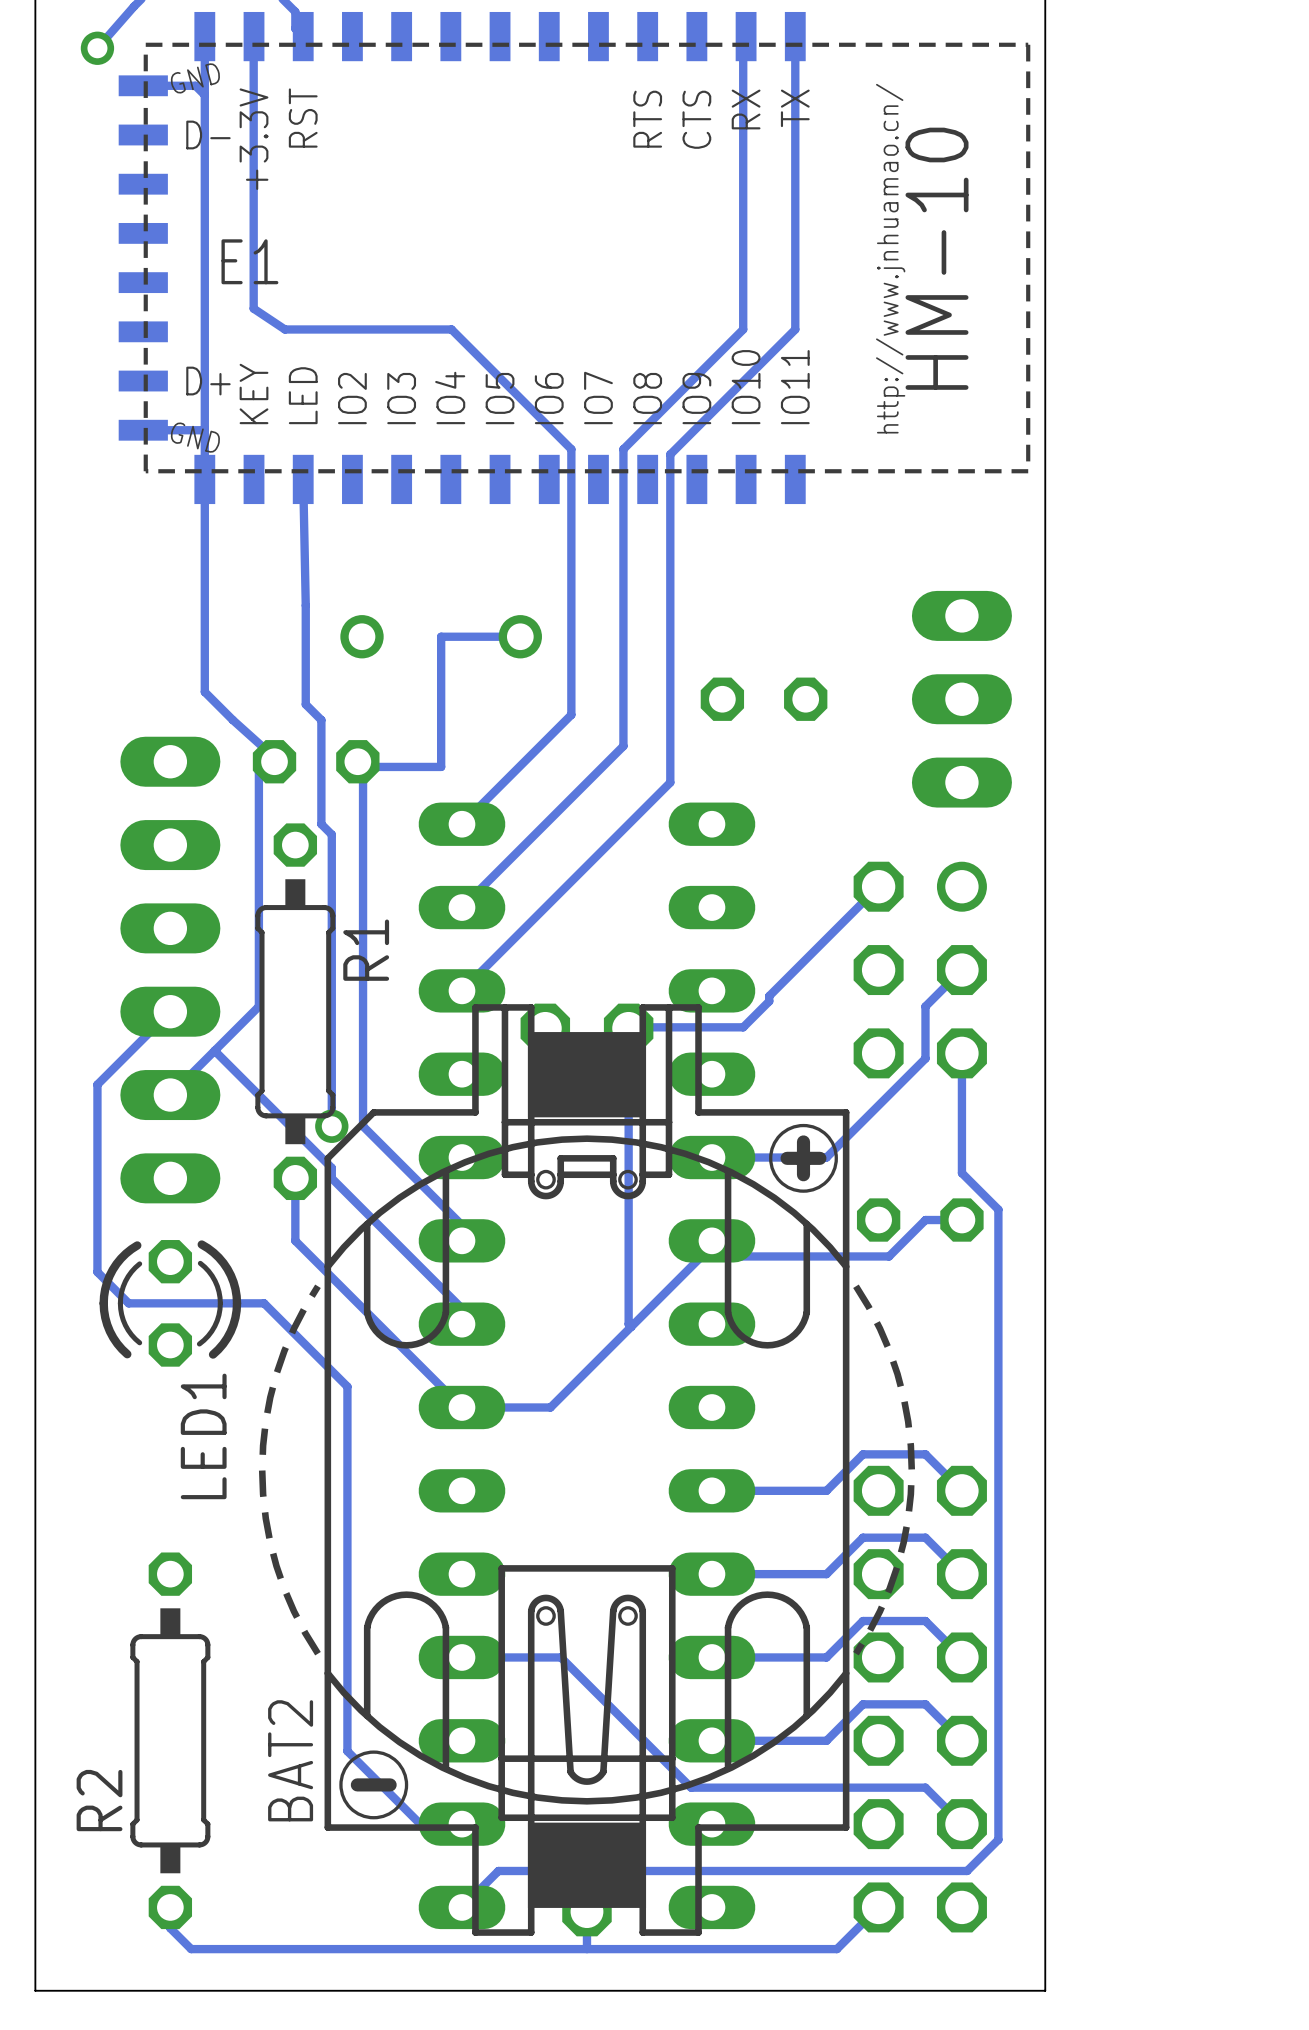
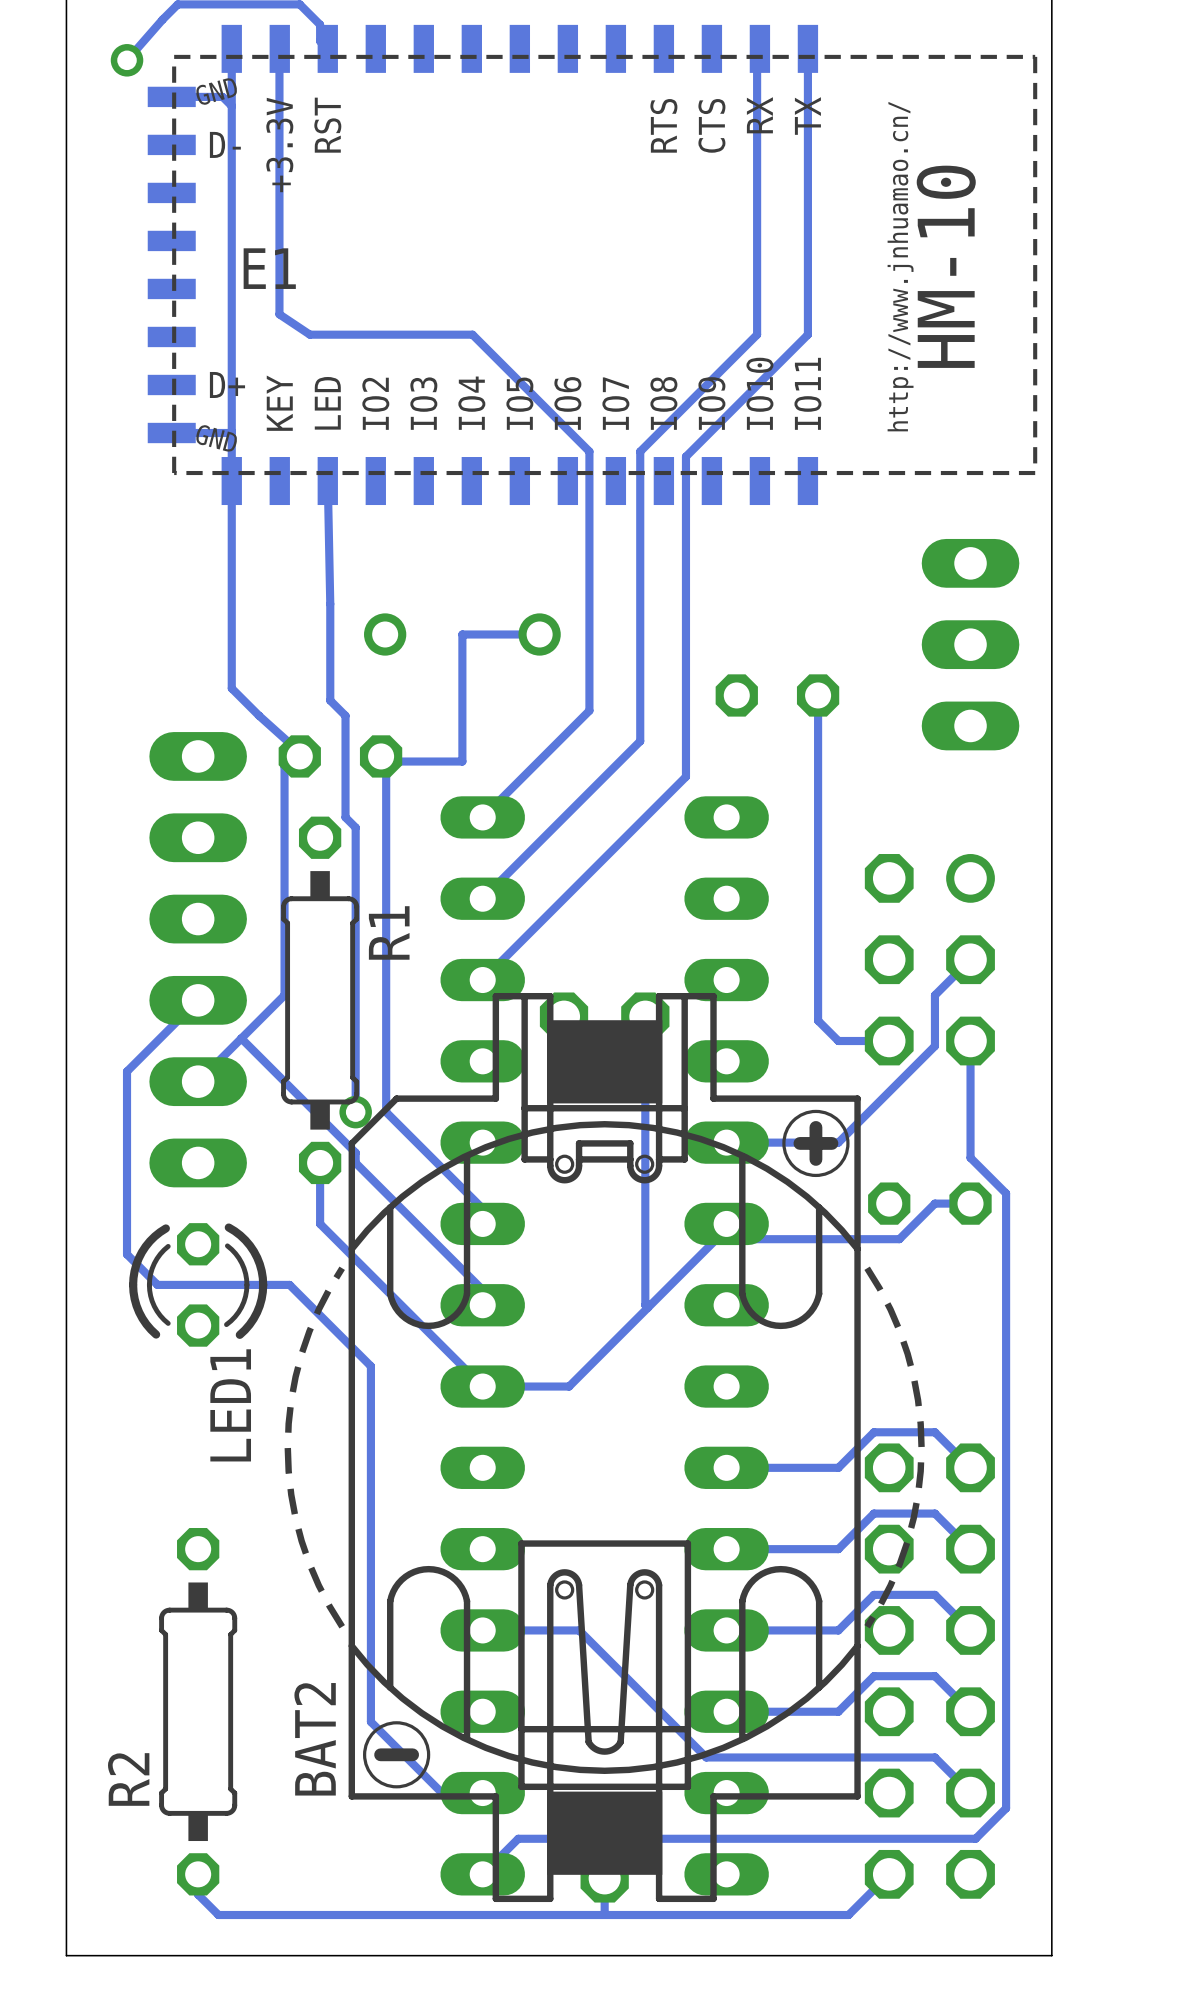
track: none -> (818, 695) (818, 1020) (838, 1041) (889, 1041)
part position: (961, 699) -> (970, 644)
track: (878, 886) (769, 996) (769, 1001) (743, 1027) (628, 1028) -> none

